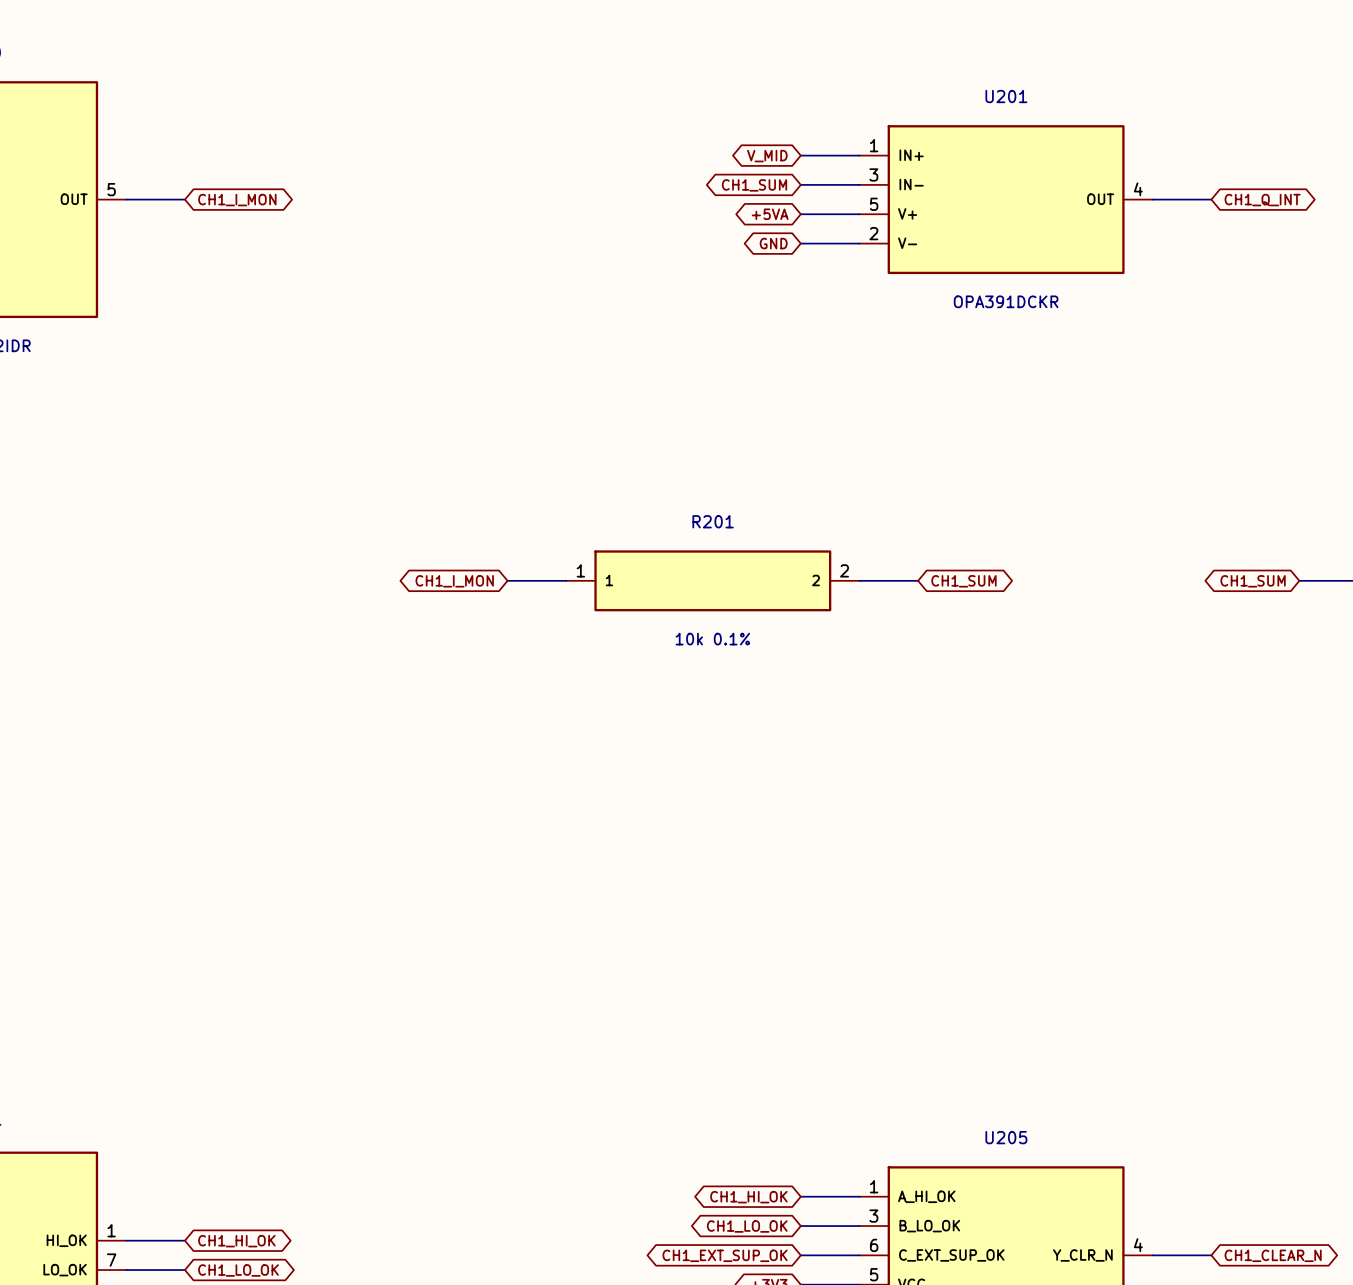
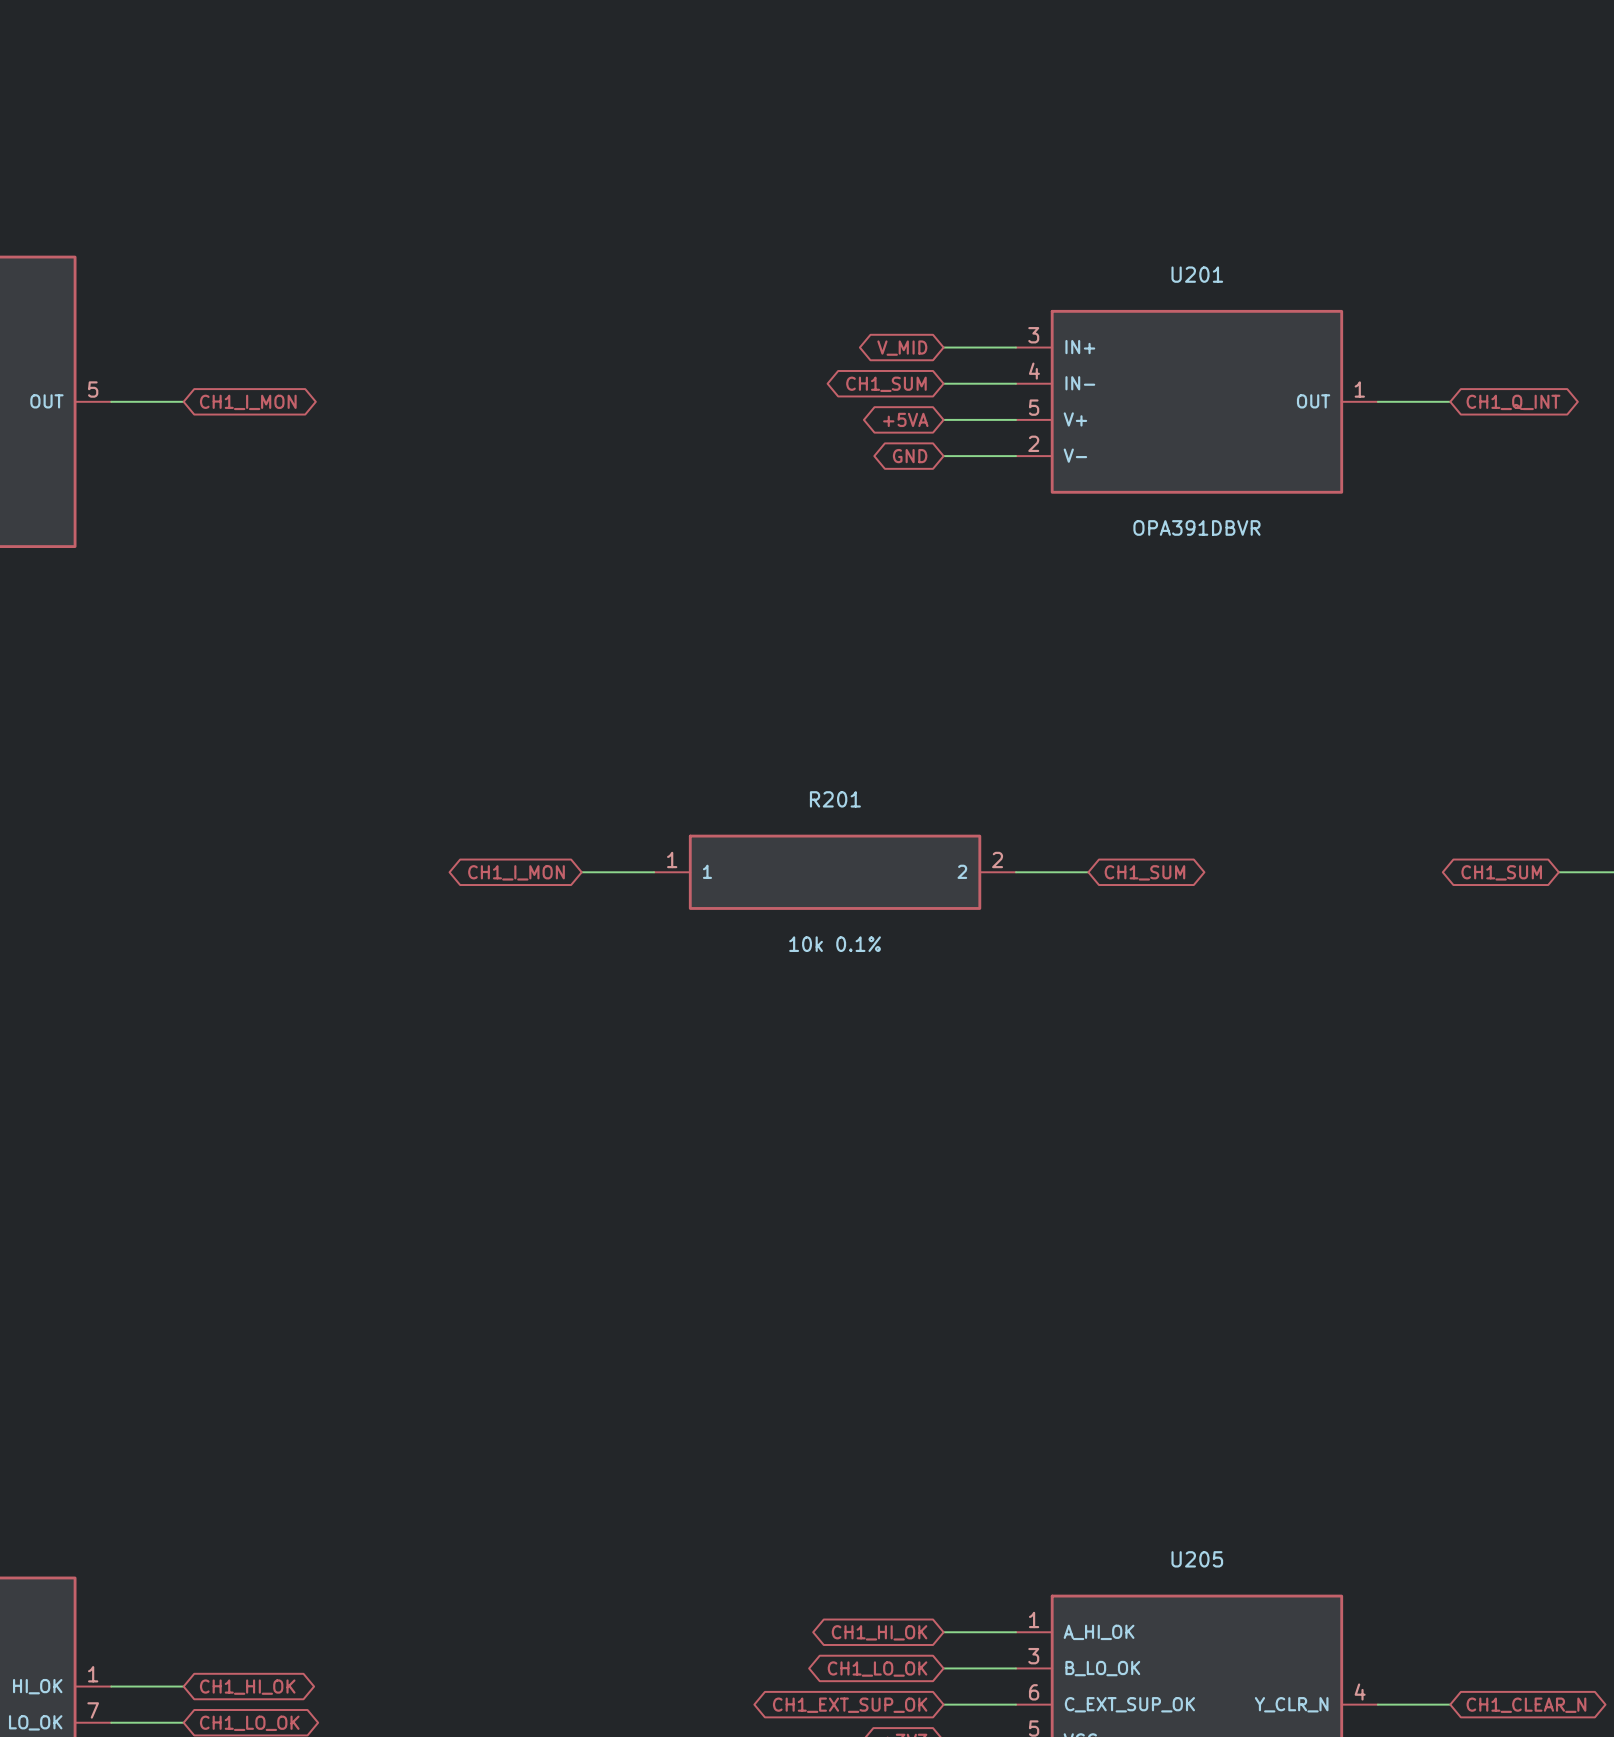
U201 pin number: 1 (874, 145) -> 3 (1033, 335)
U201 pin number: 3 (873, 174) -> 4 (1034, 371)
U201 pin number: 4 (1138, 189) -> 1 (1359, 389)
U201 value: OPA391DCKR (1006, 301) -> OPA391DBVR (1196, 527)

